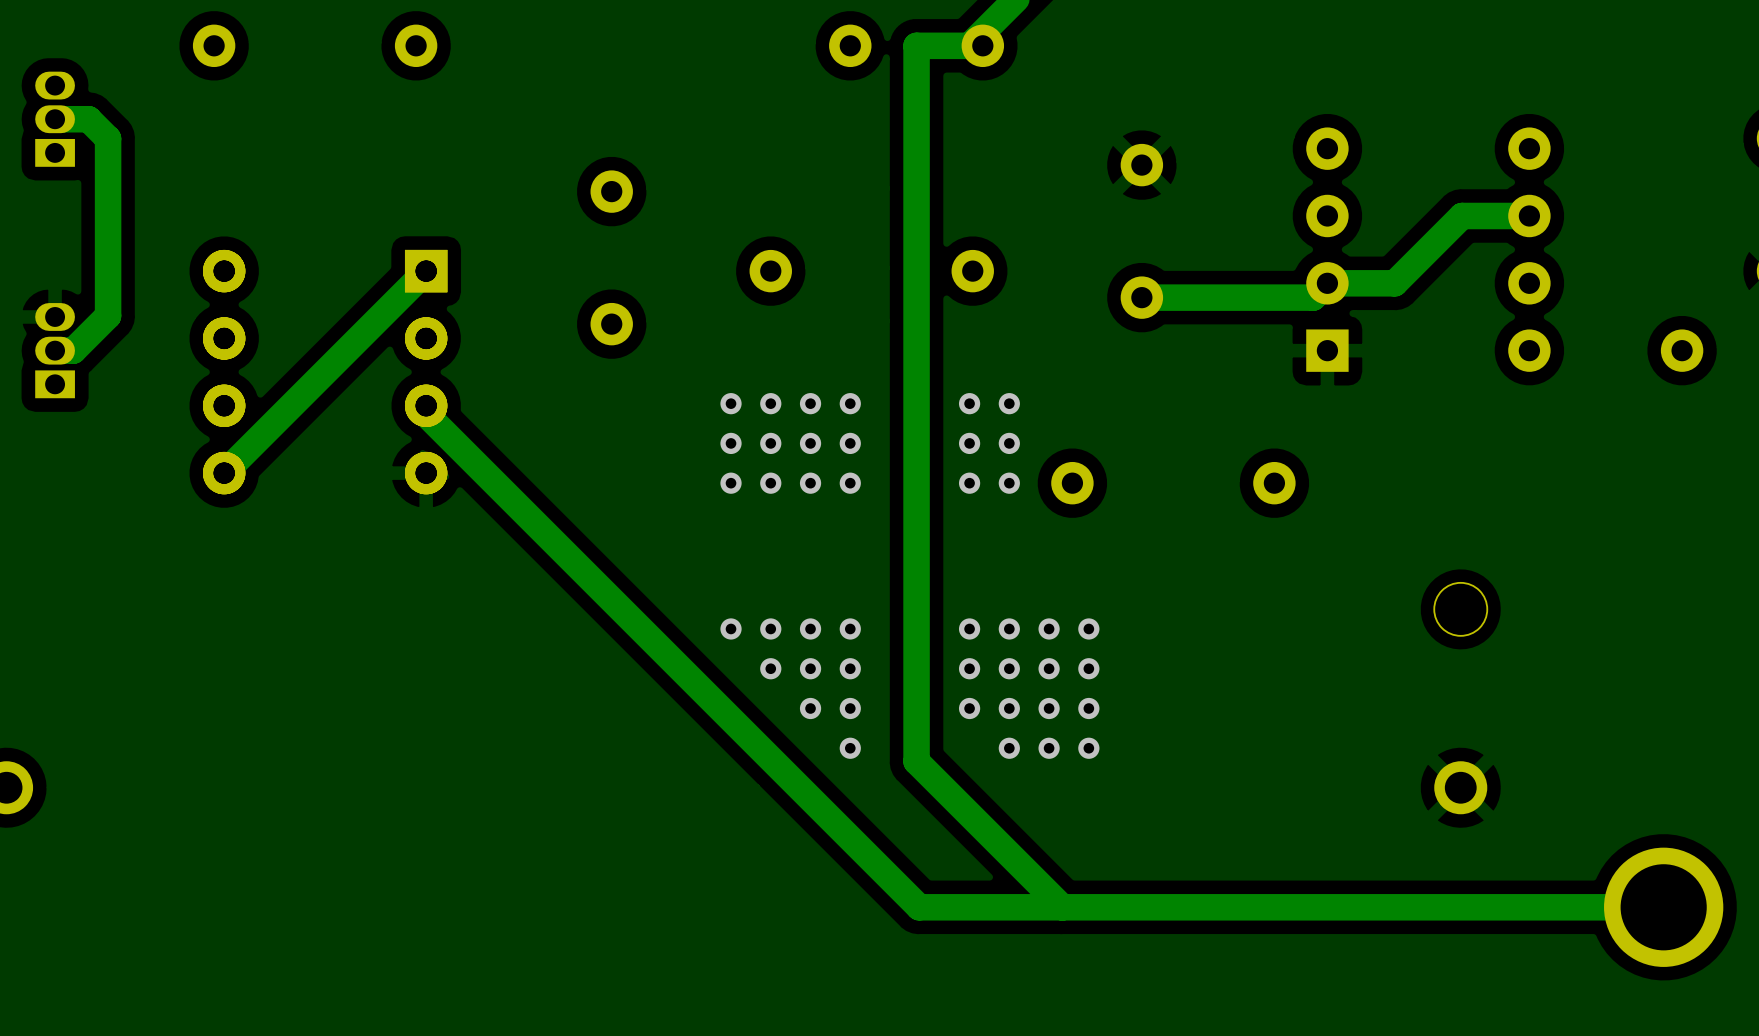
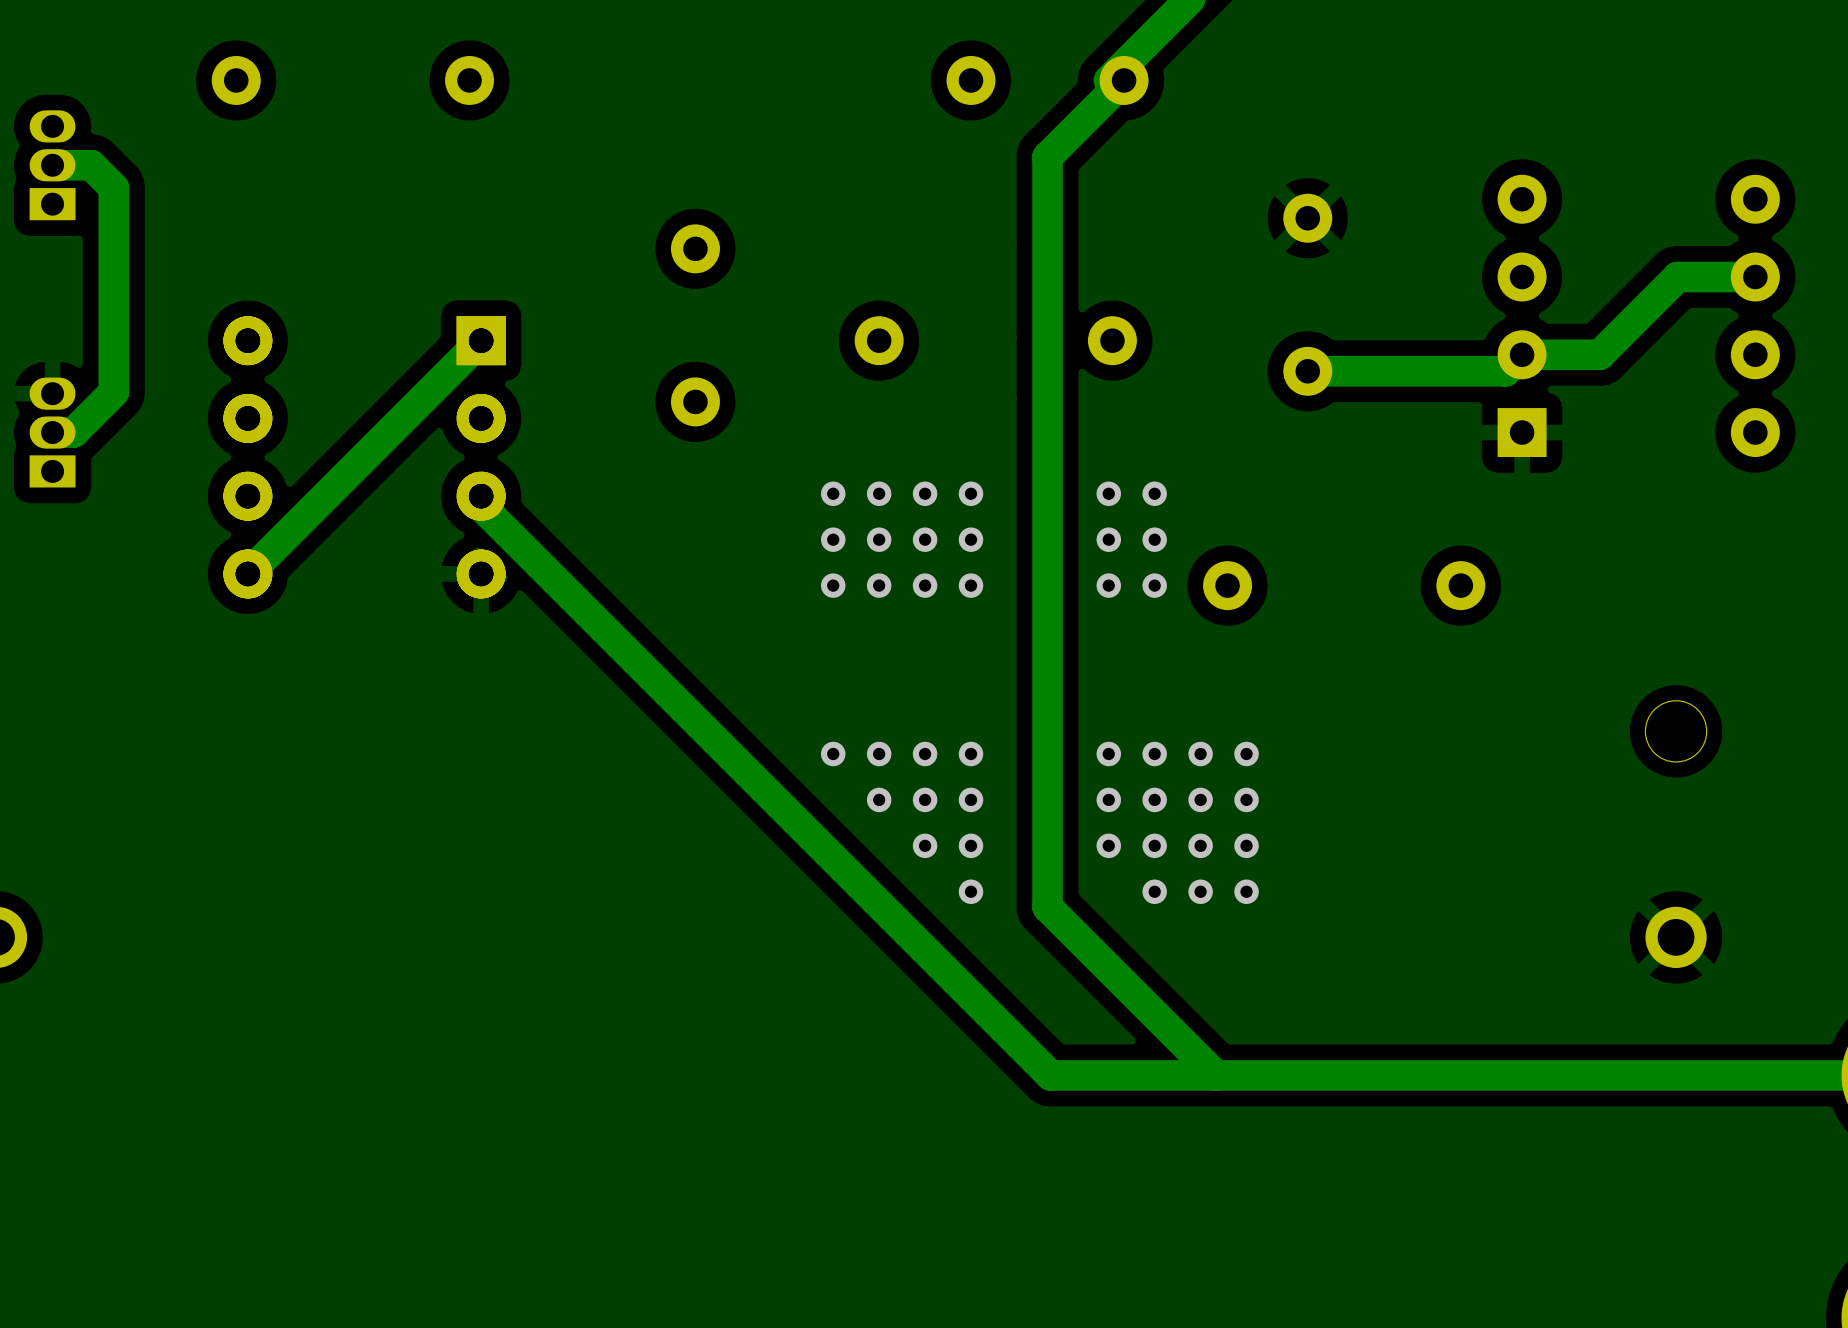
track: (969, 45) (916, 45) (916, 112) -> (1124, 80) (1047, 157)

